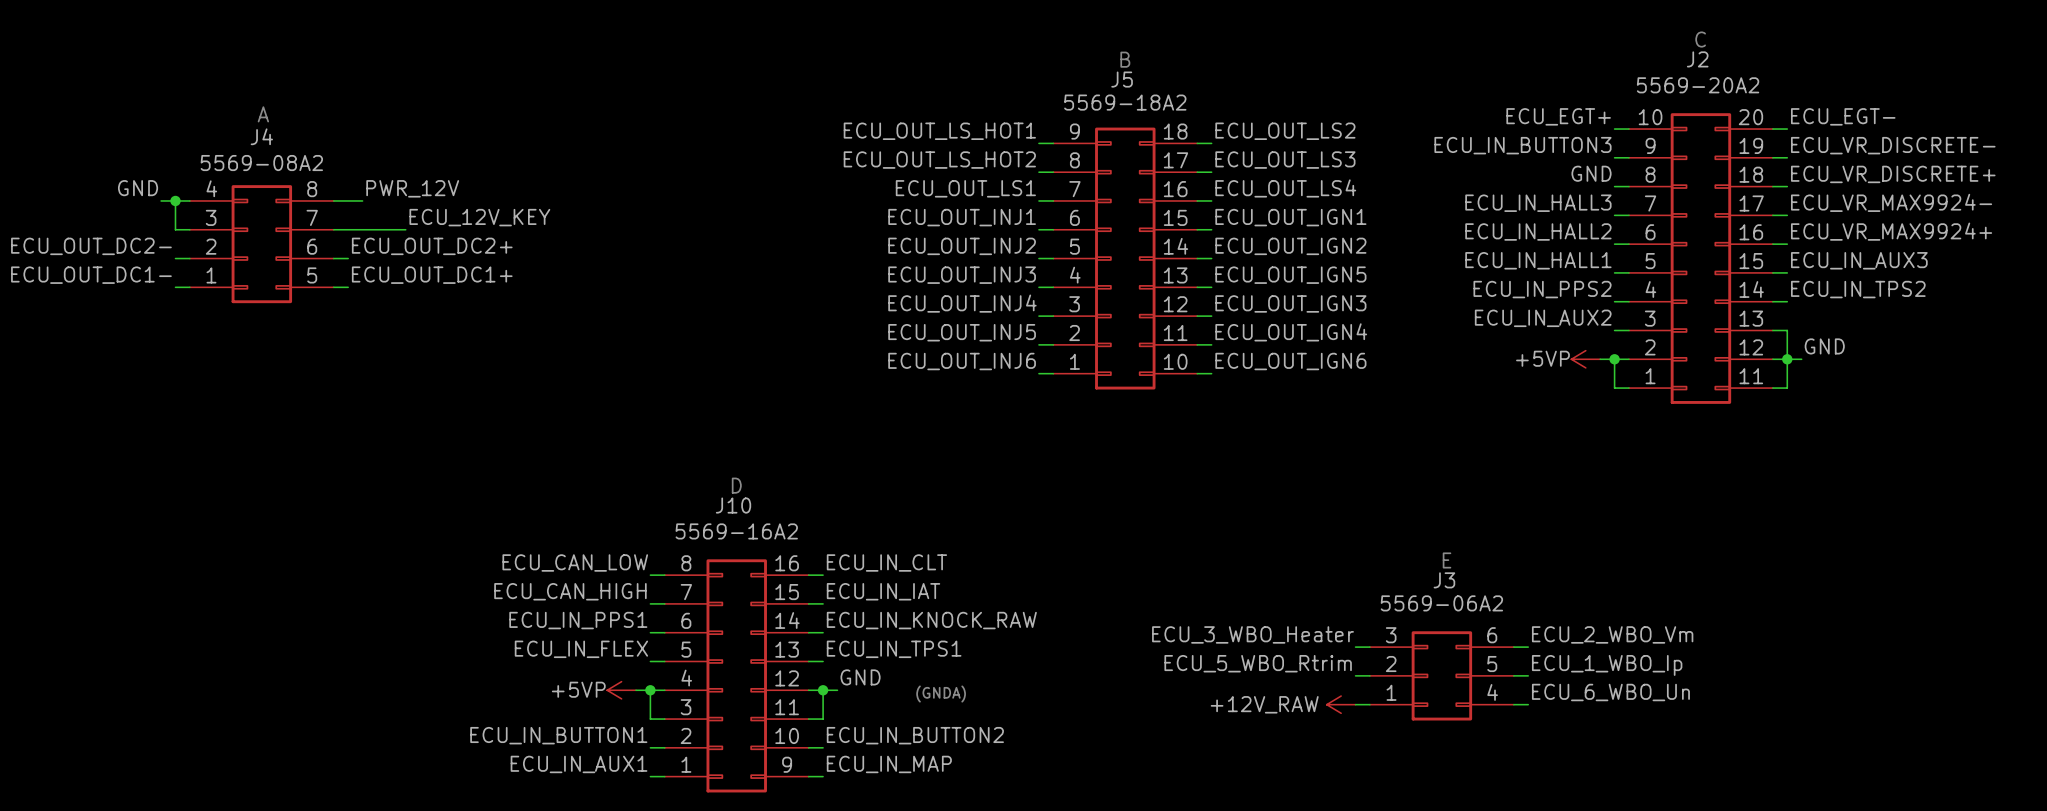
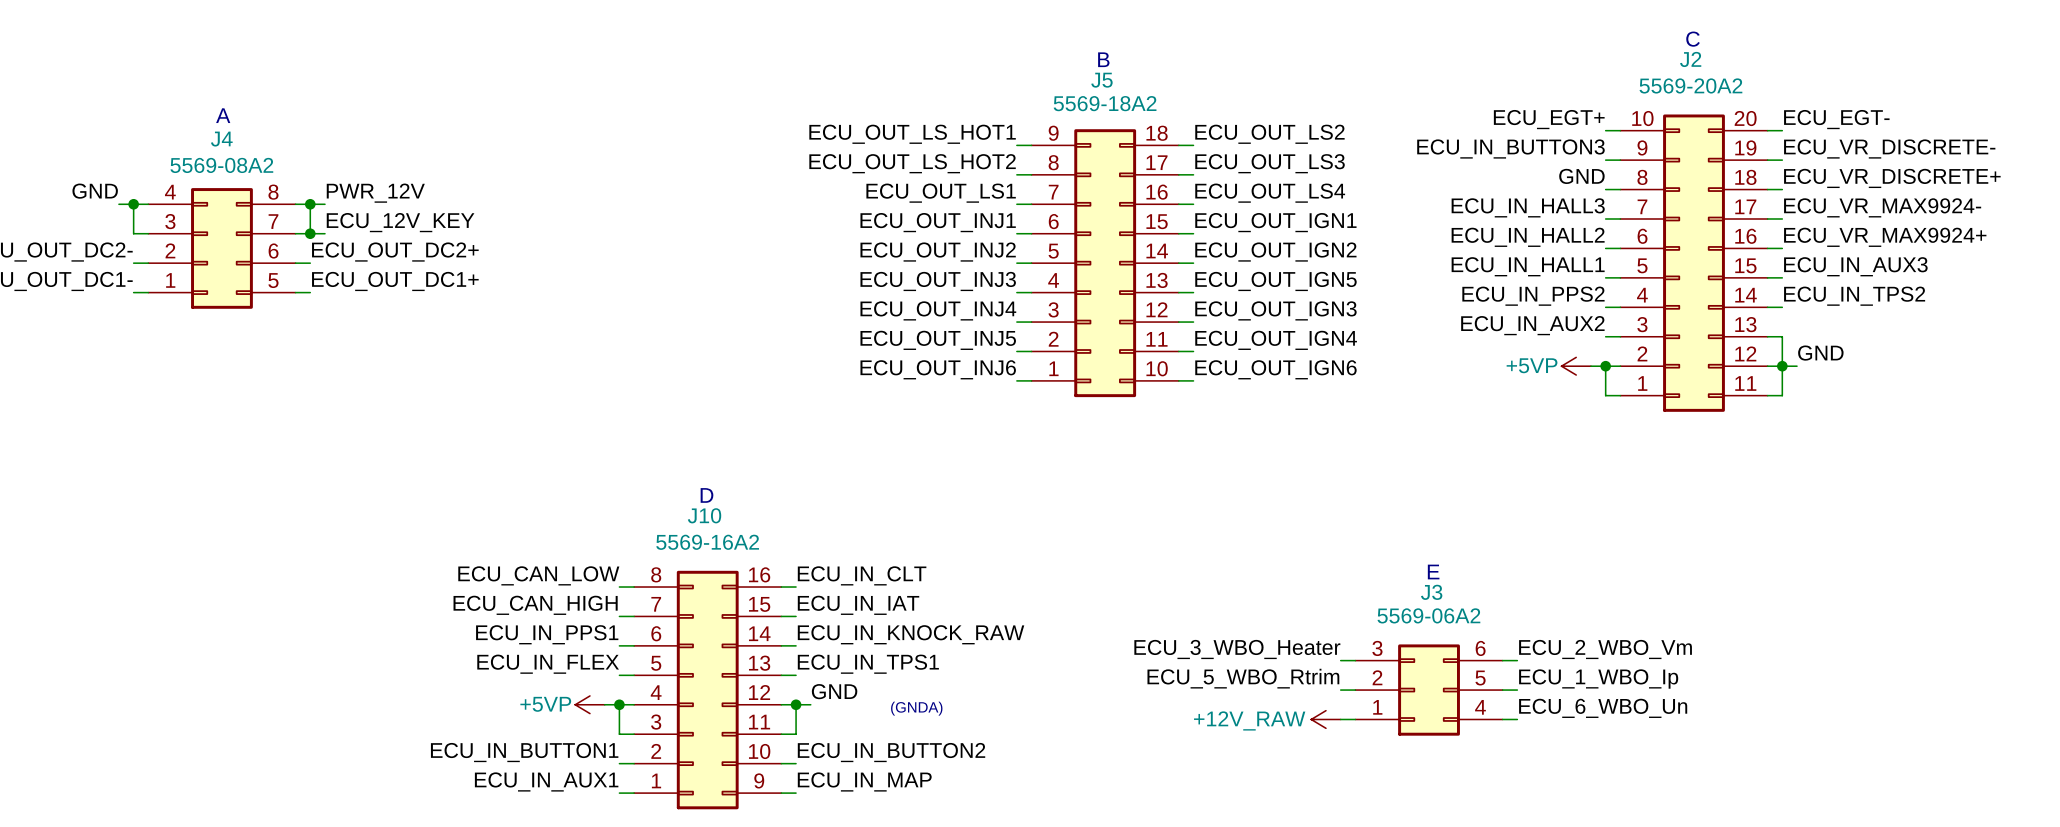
wire: none -> (310, 204) (310, 233)
junction: none -> (310, 204)
label position: ECU_12V_KEY (479, 217) -> ECU_12V_KEY (400, 222)
junction: none -> (310, 233)
wire: (362, 229) (405, 229) -> none

